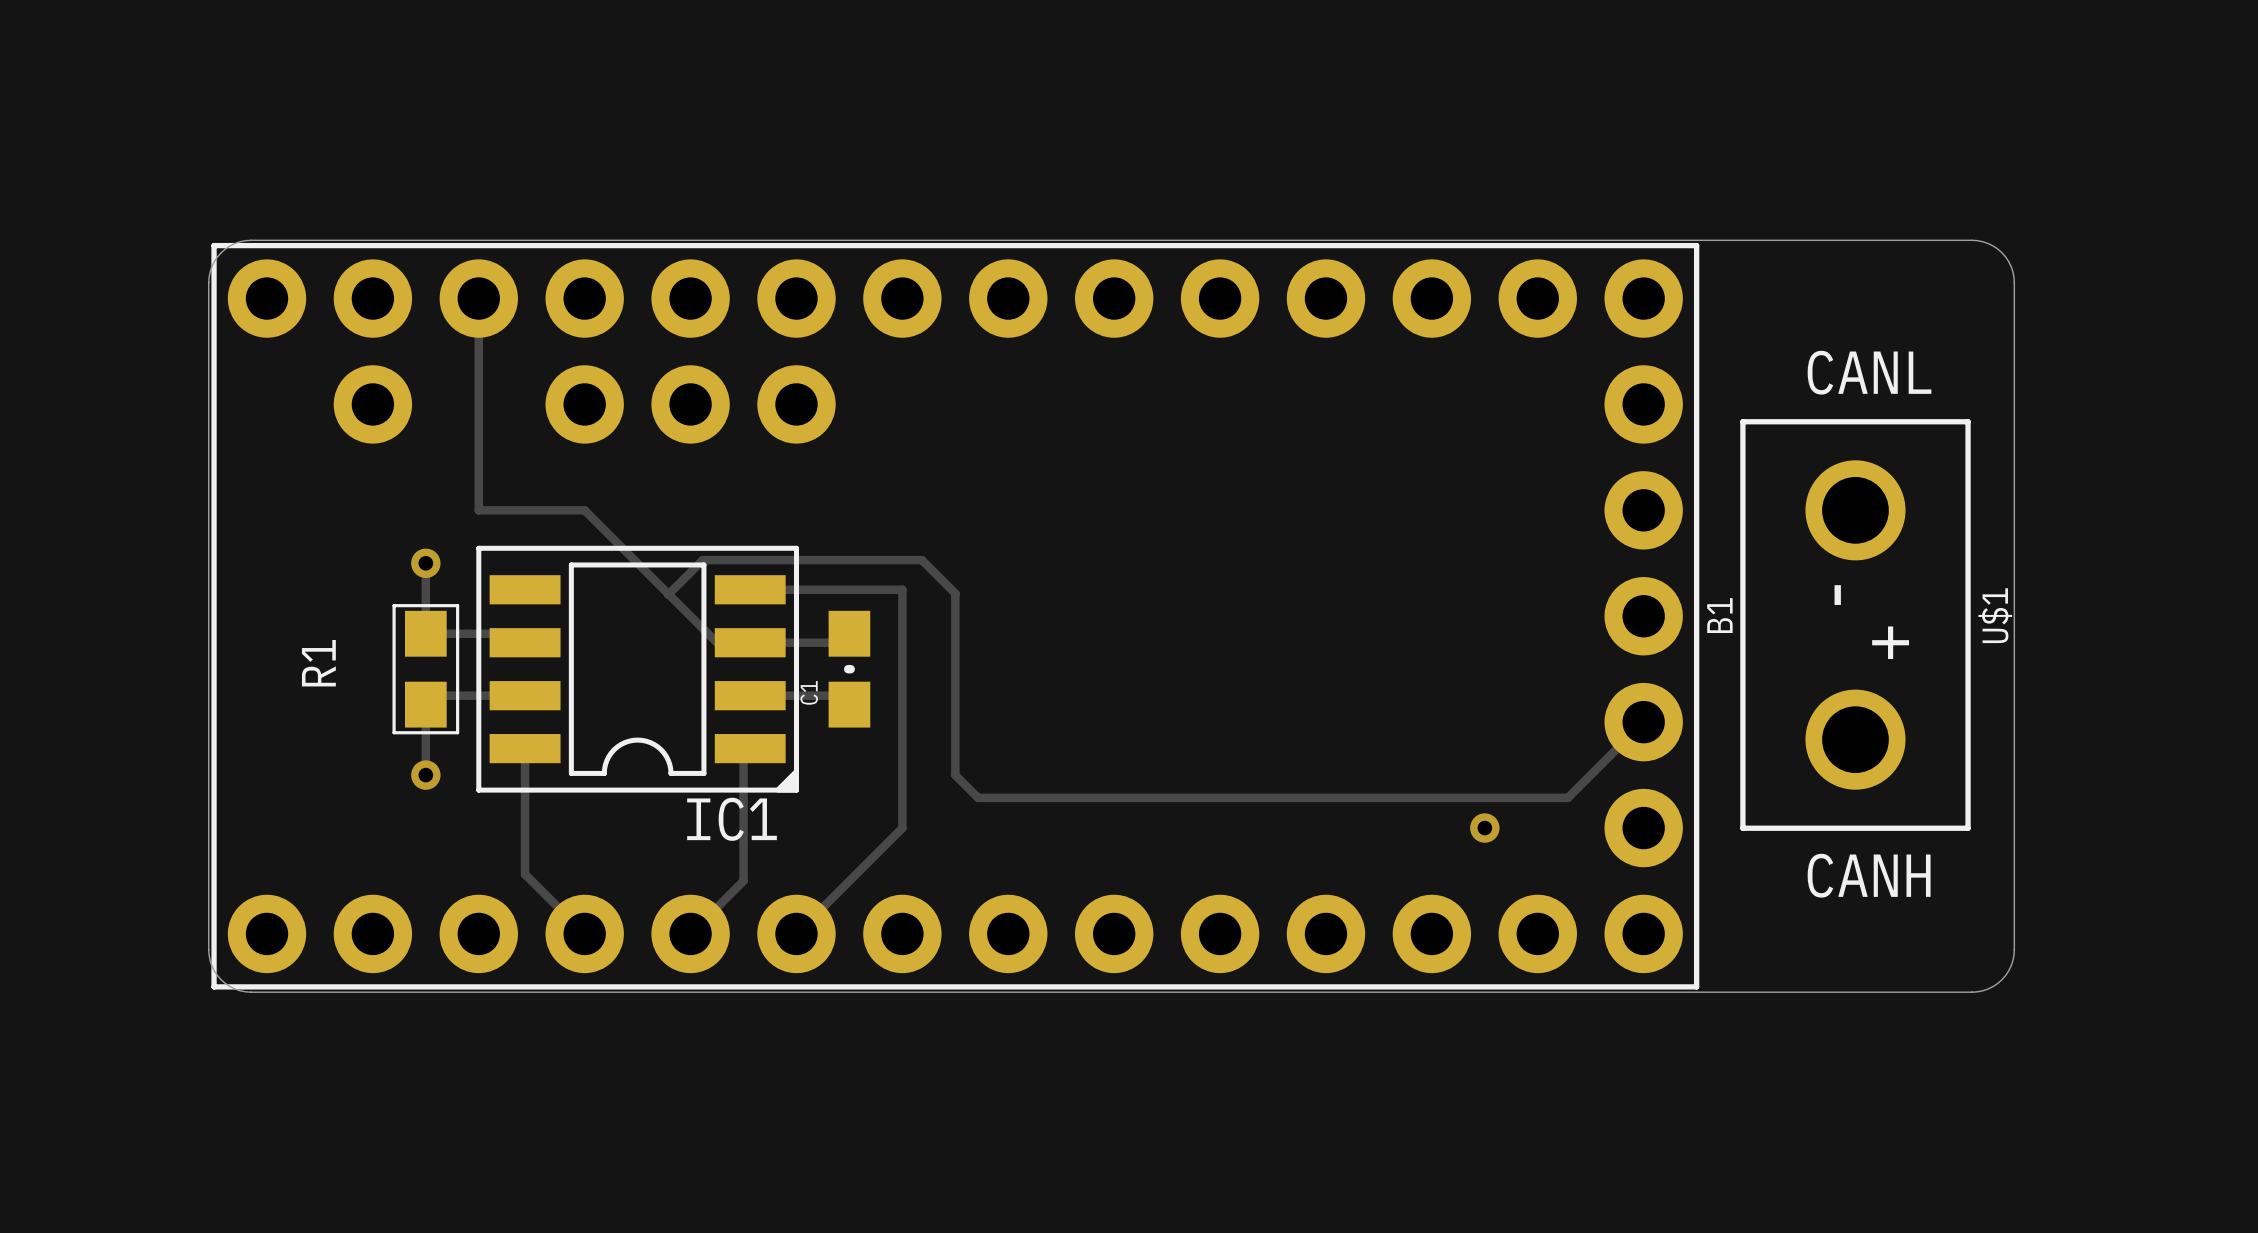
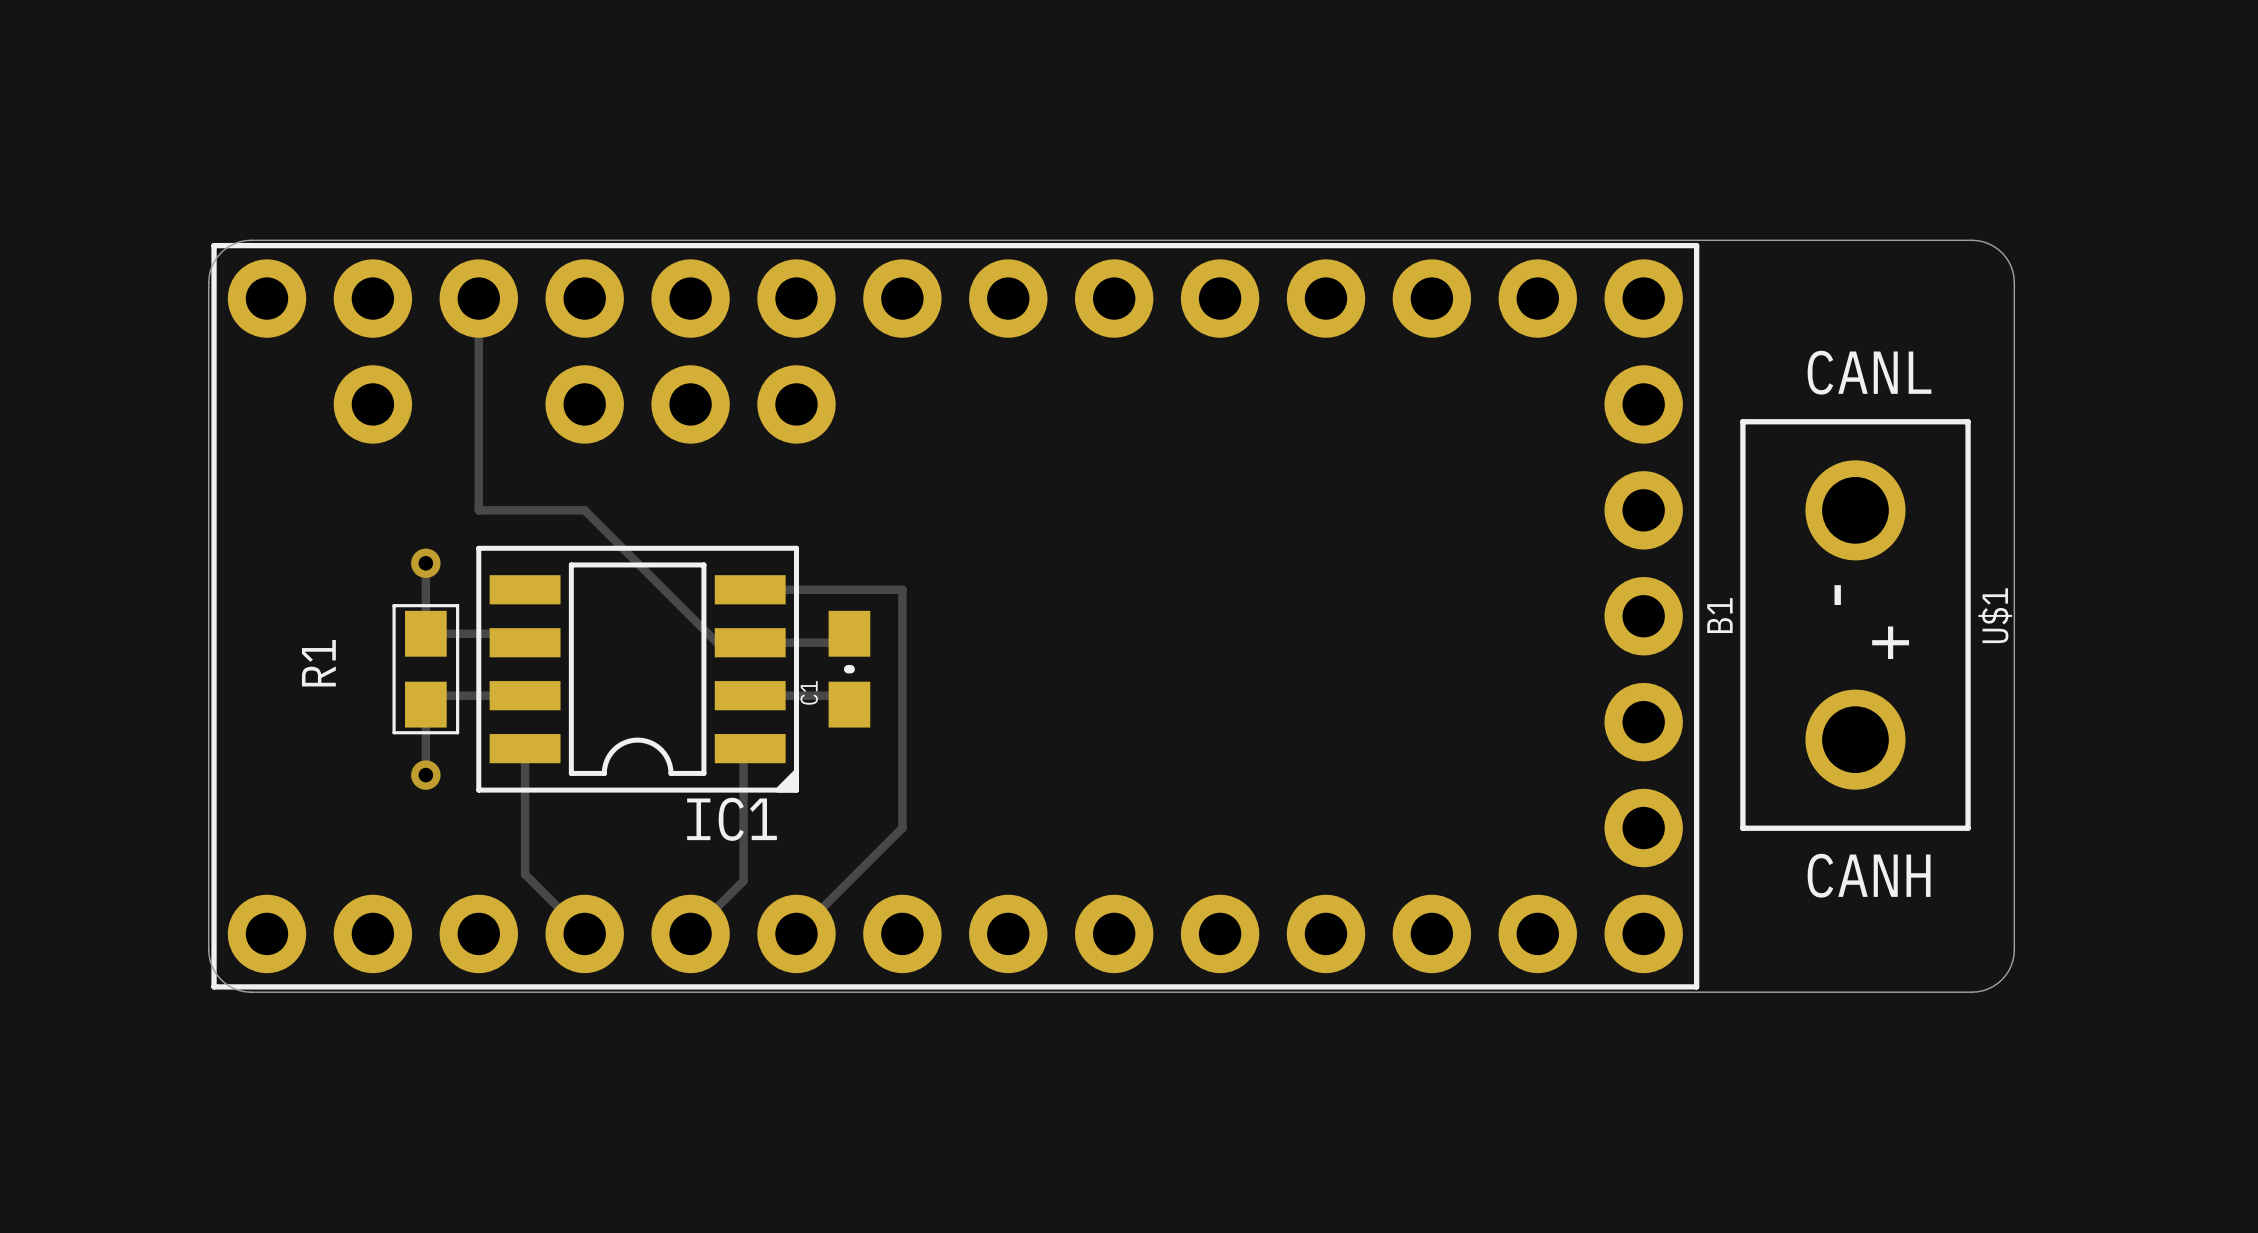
track: (668, 594) (702, 560) (921, 560) (955, 593) (955, 775) (978, 797) (1567, 797) (1643, 722) -> none
via: (1484, 828) -> none

